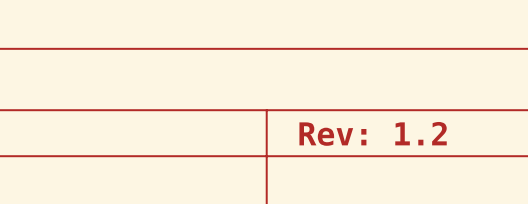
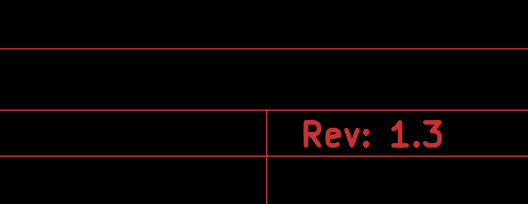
title block: Rev: 1.2 (373, 133) -> Rev: 1.3 (372, 133)

